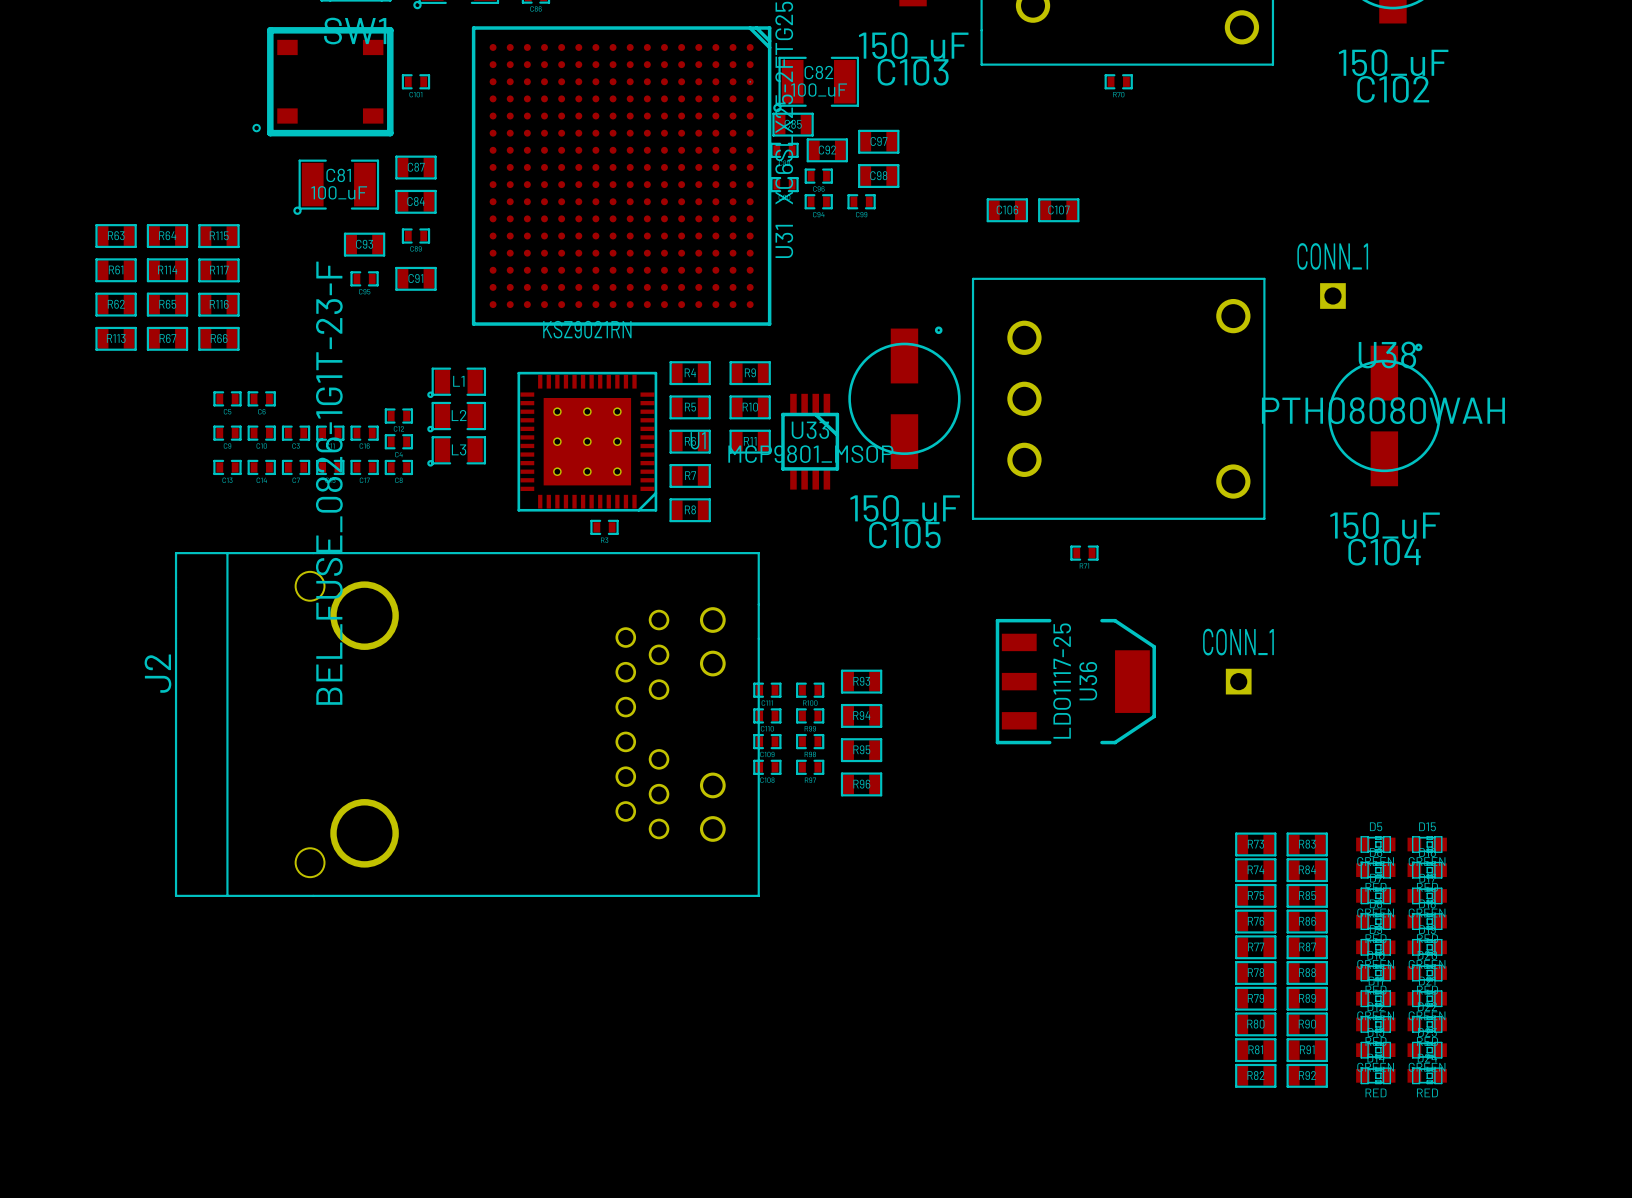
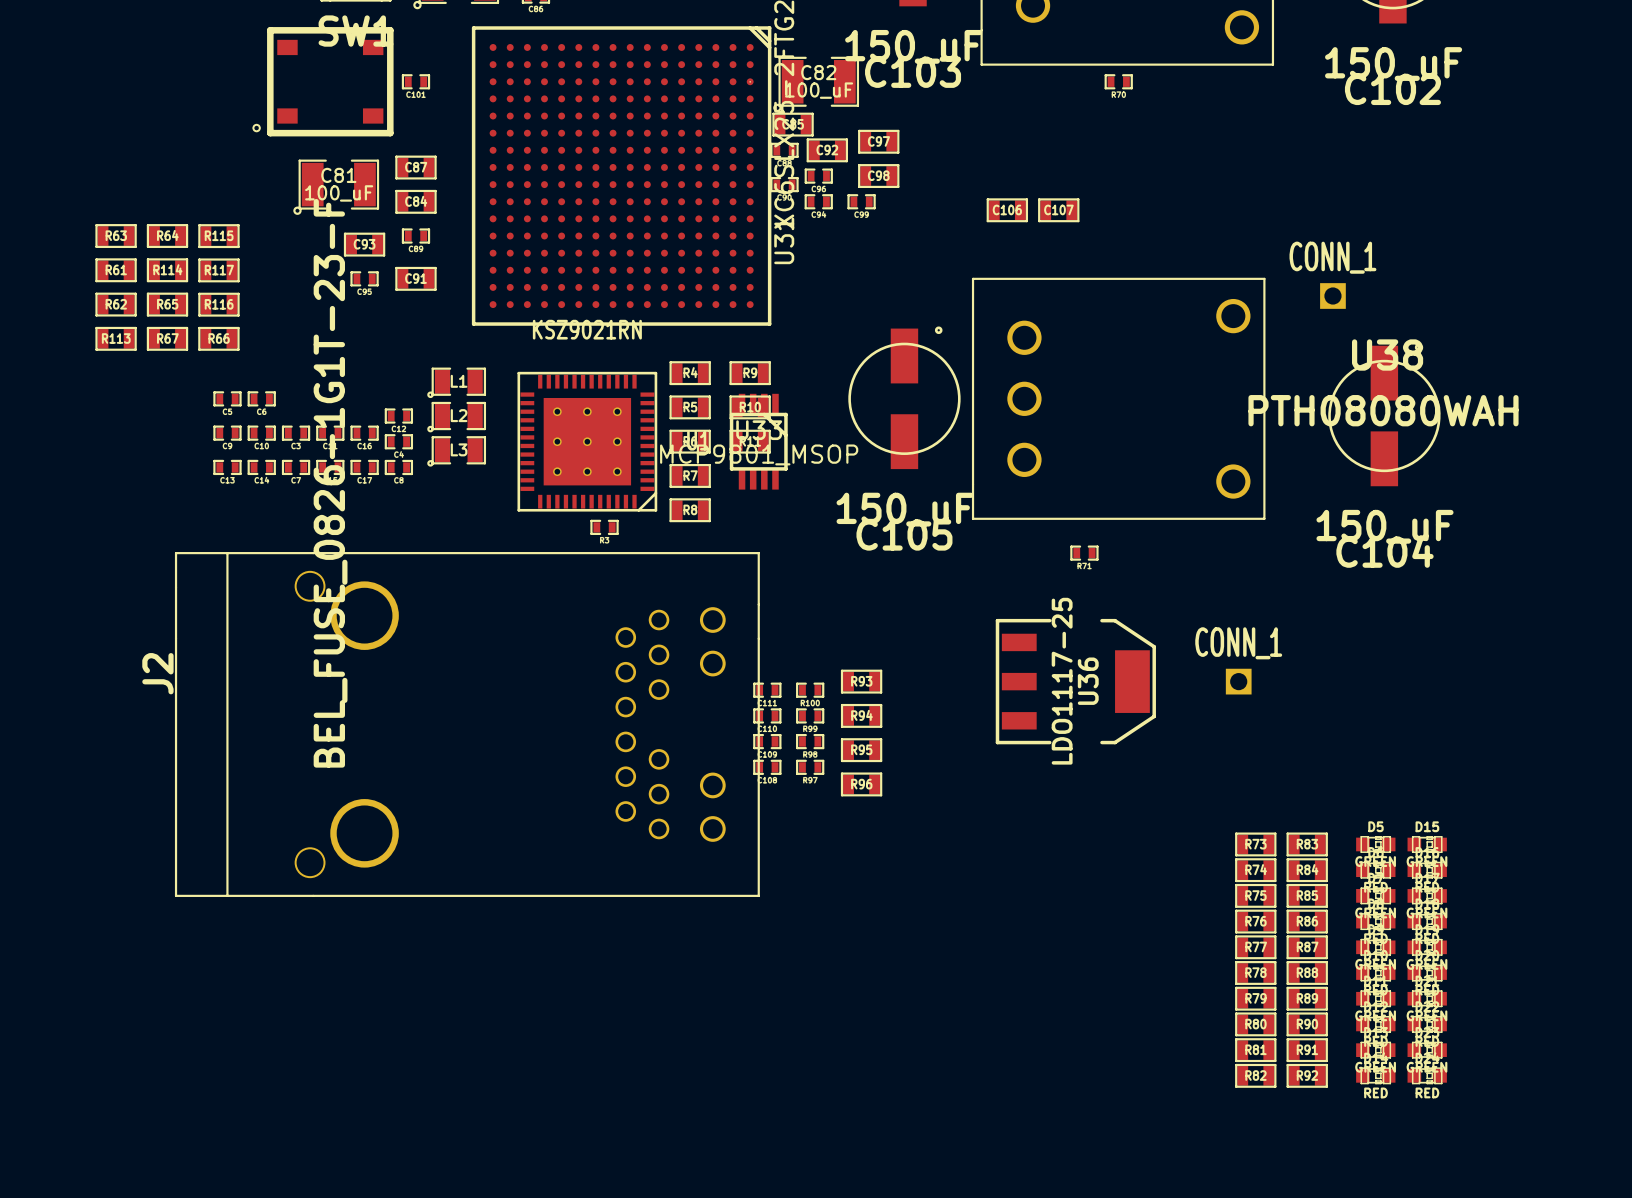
U33 position: (810, 441) -> (758, 441)

